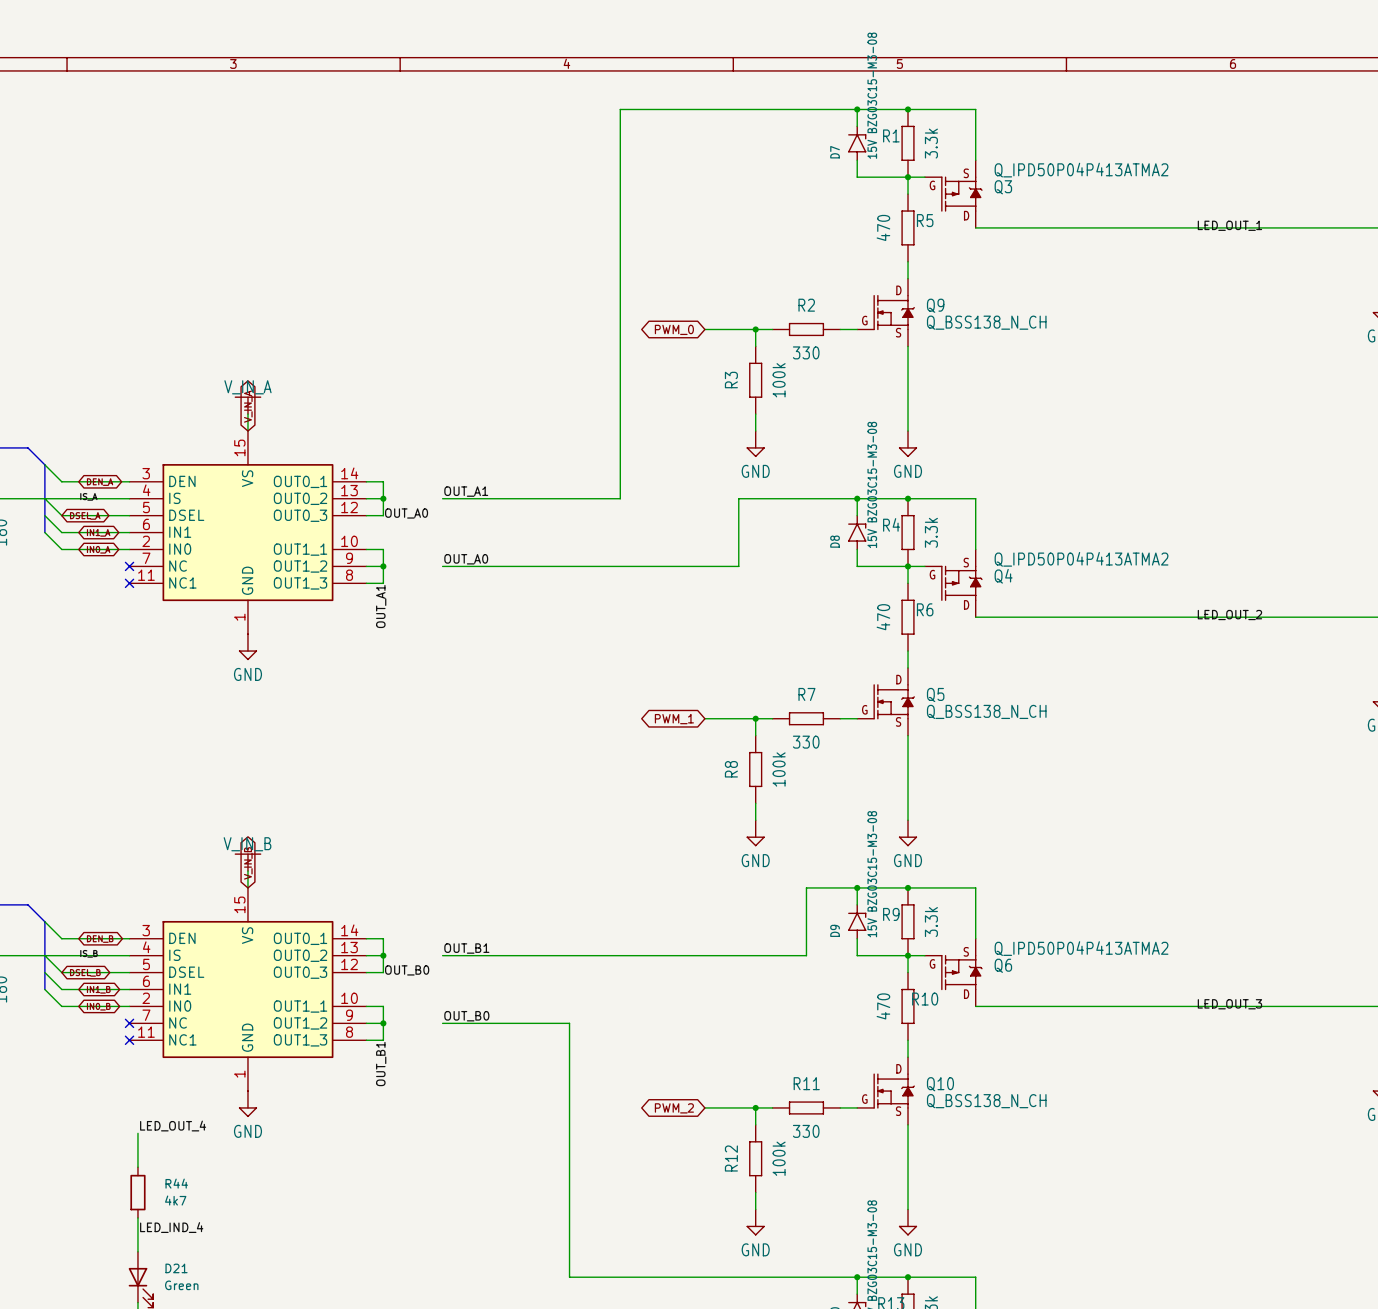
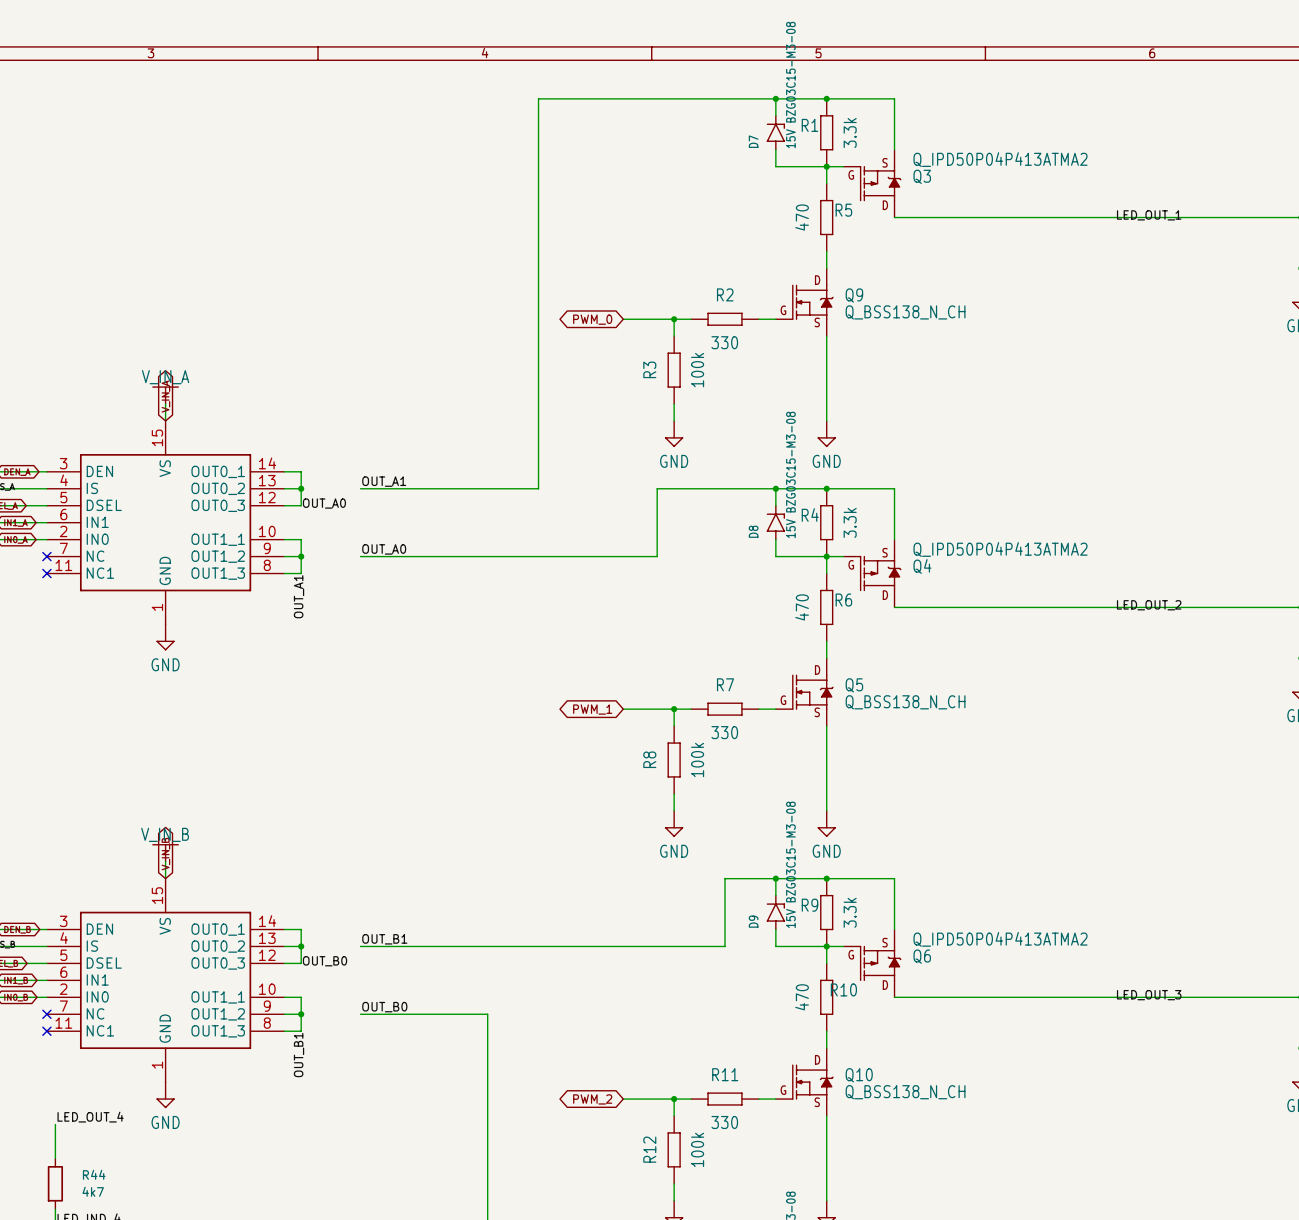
part symbol: [129, 431, 367, 635] -> [46, 420, 285, 625]
part symbol: [129, 887, 367, 1092] -> [46, 878, 285, 1083]

